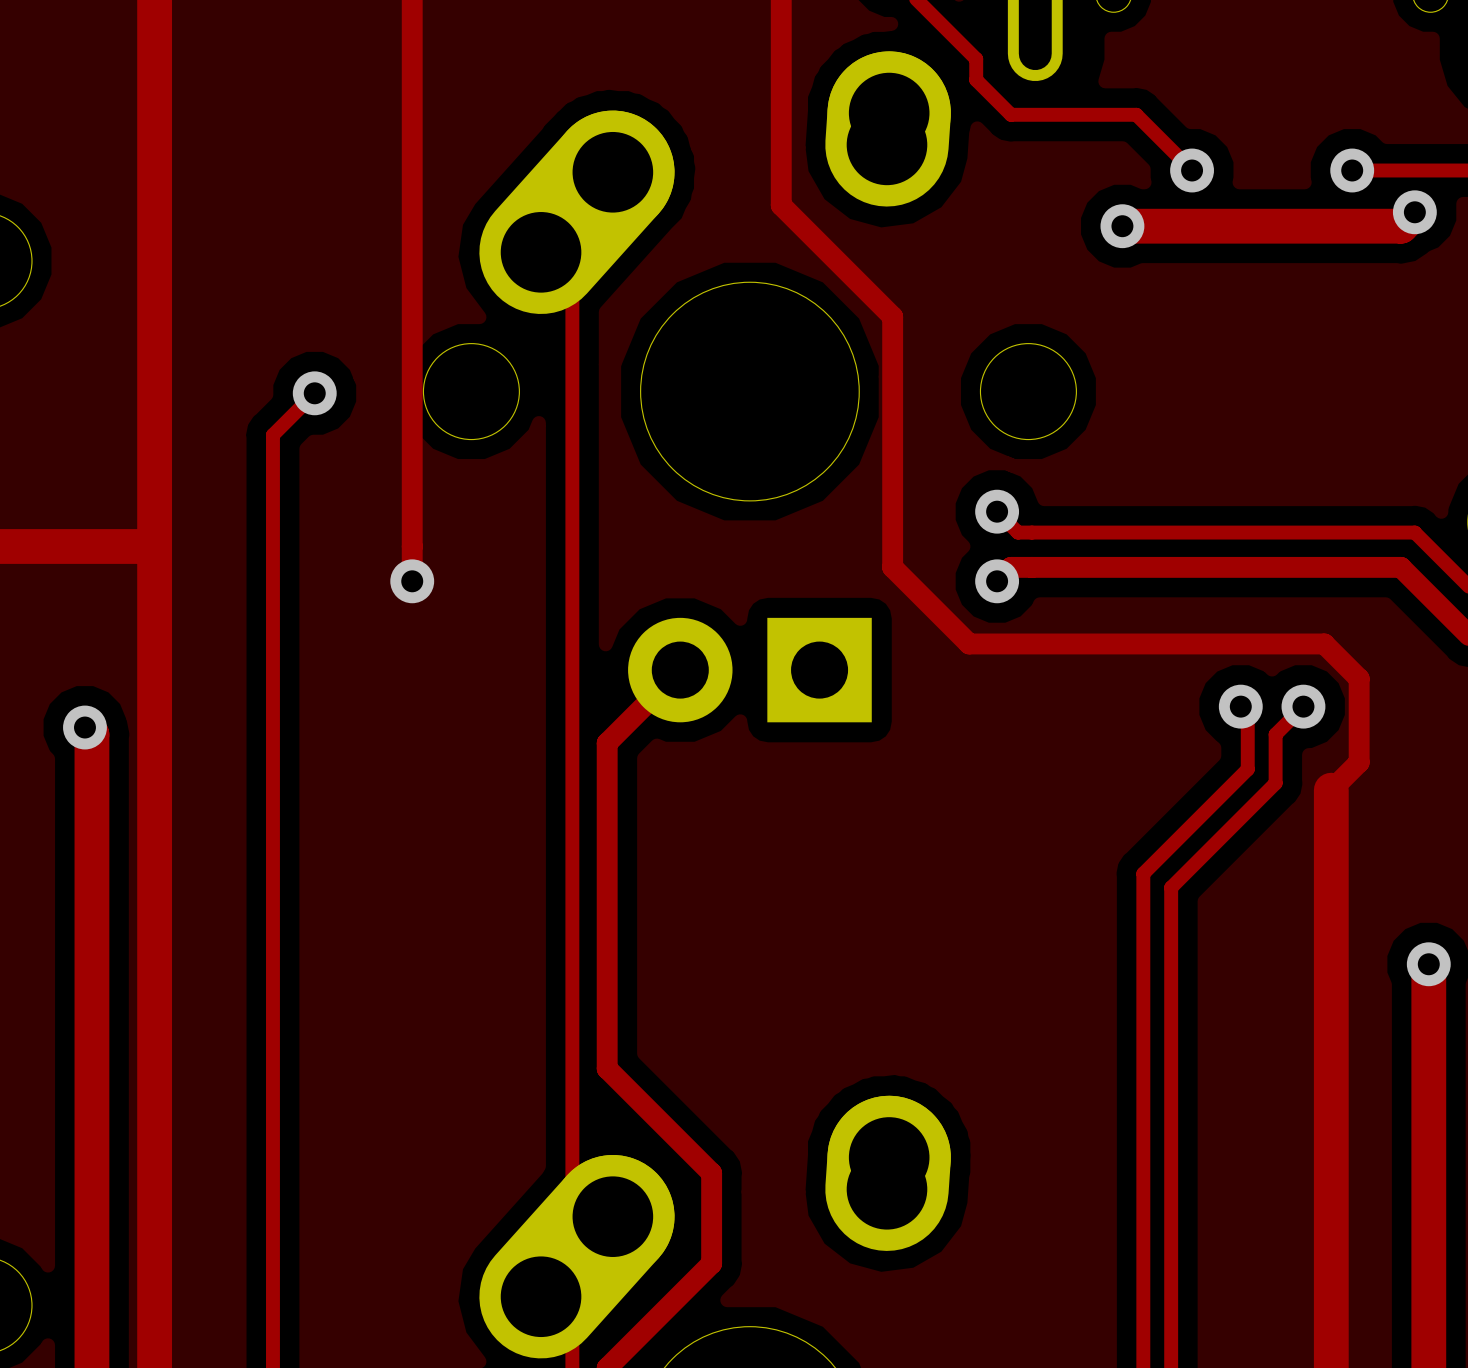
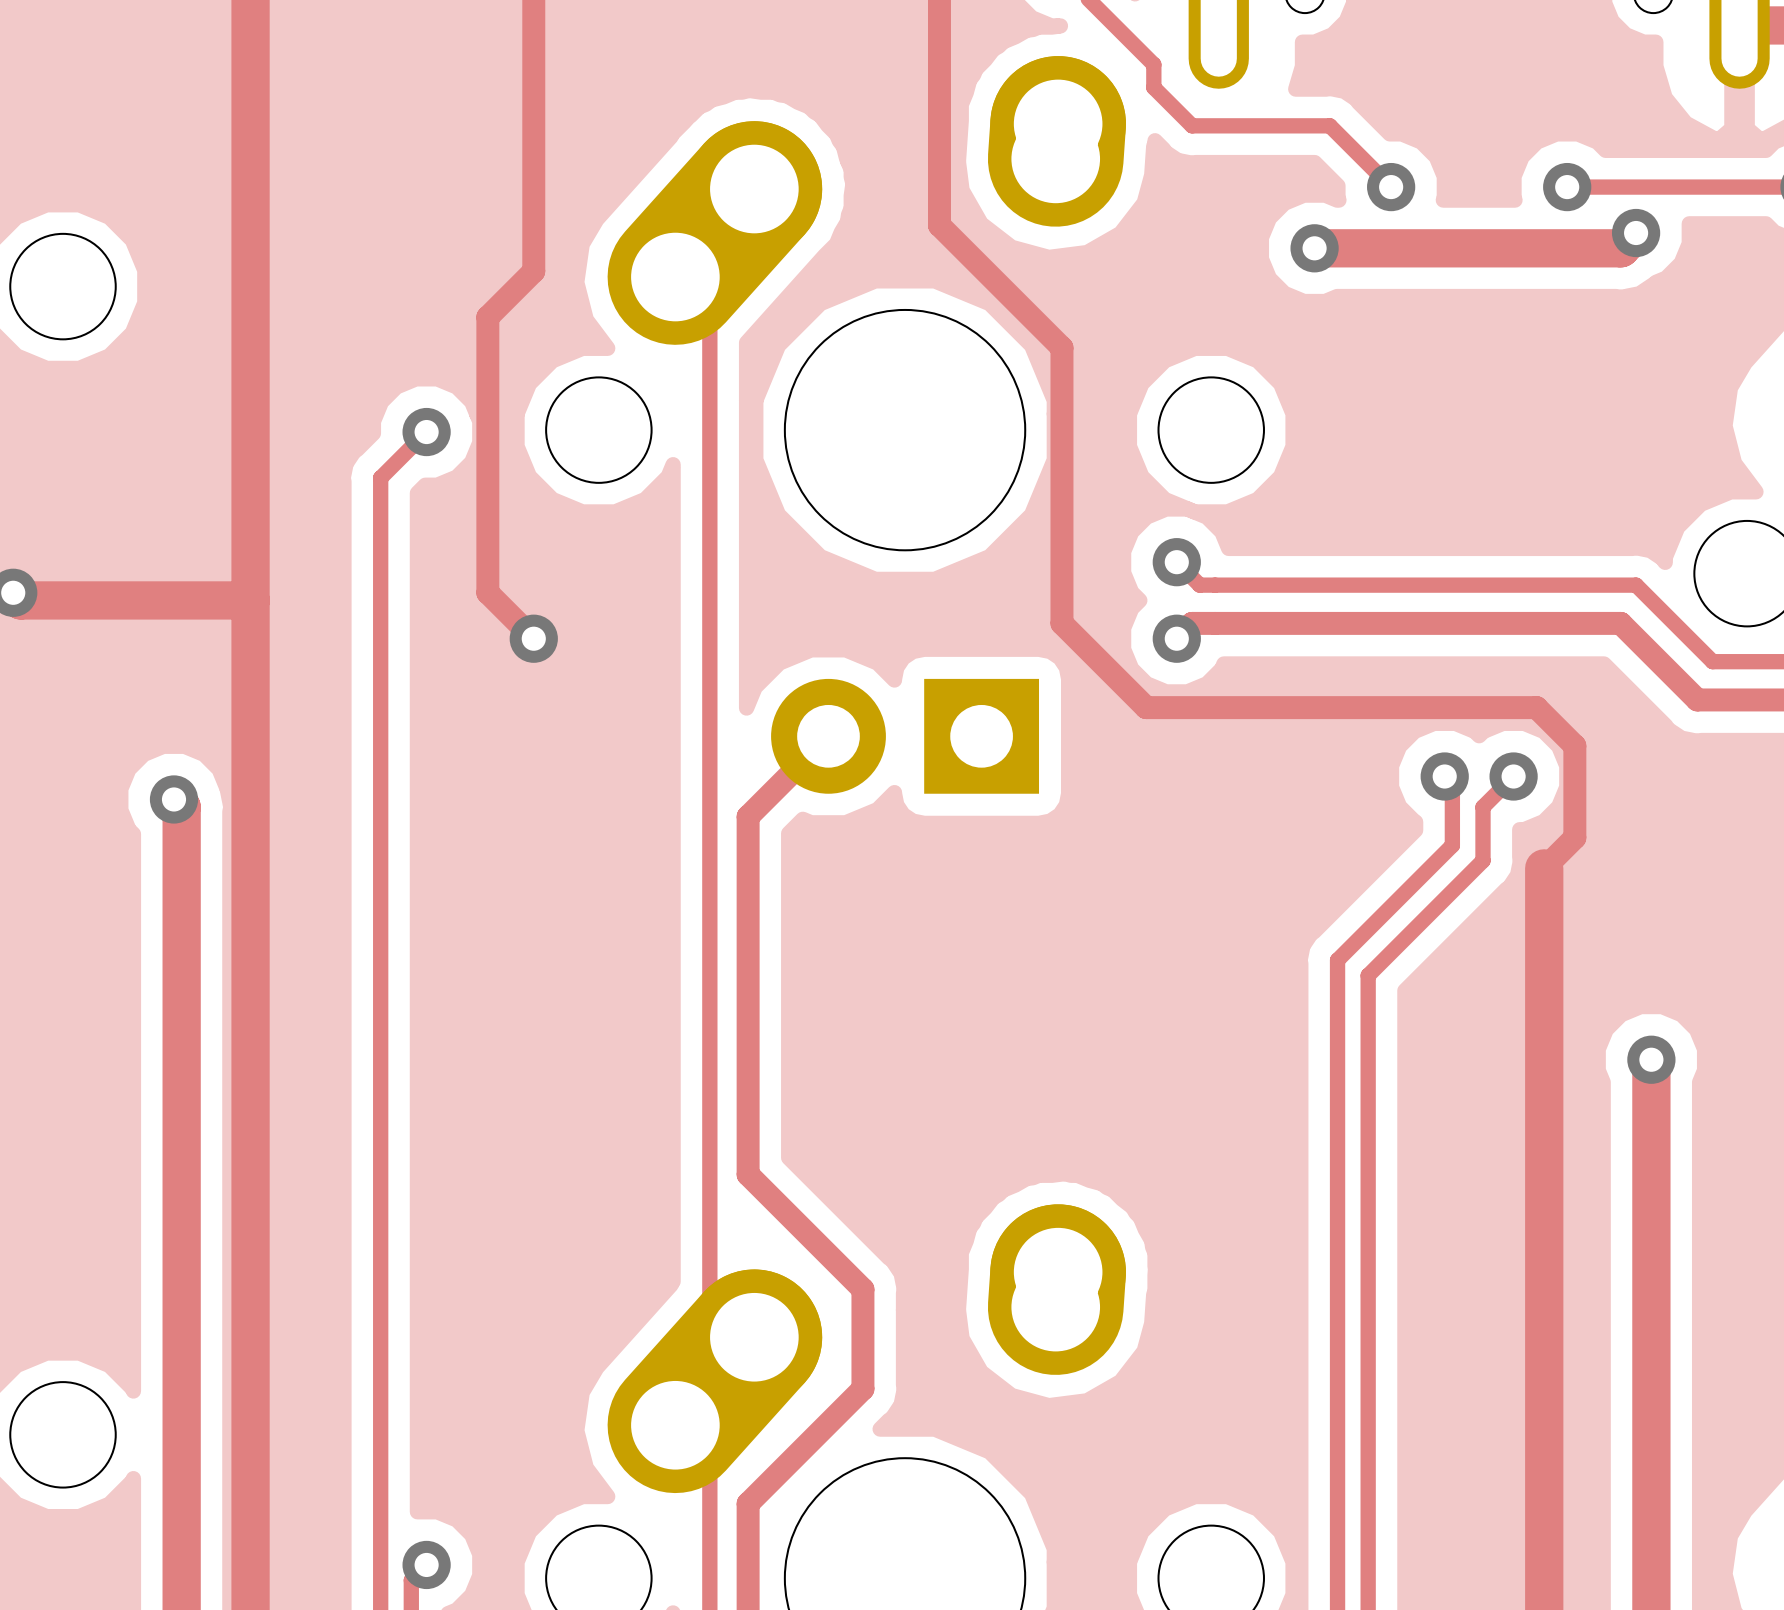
track: (412, 247) (412, 581) -> (533, 271) (487, 317) (487, 592) (533, 638)

